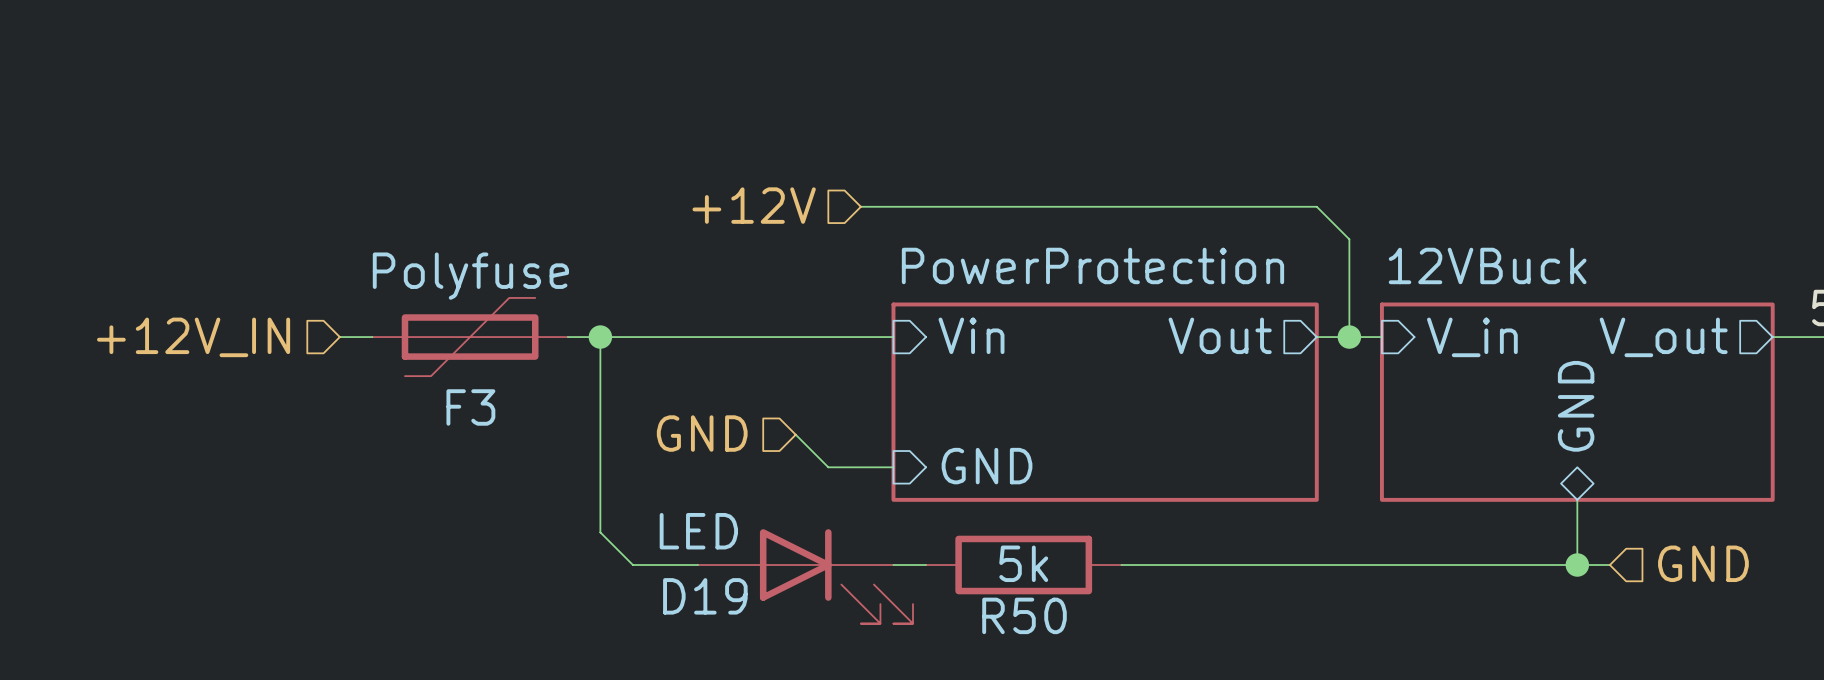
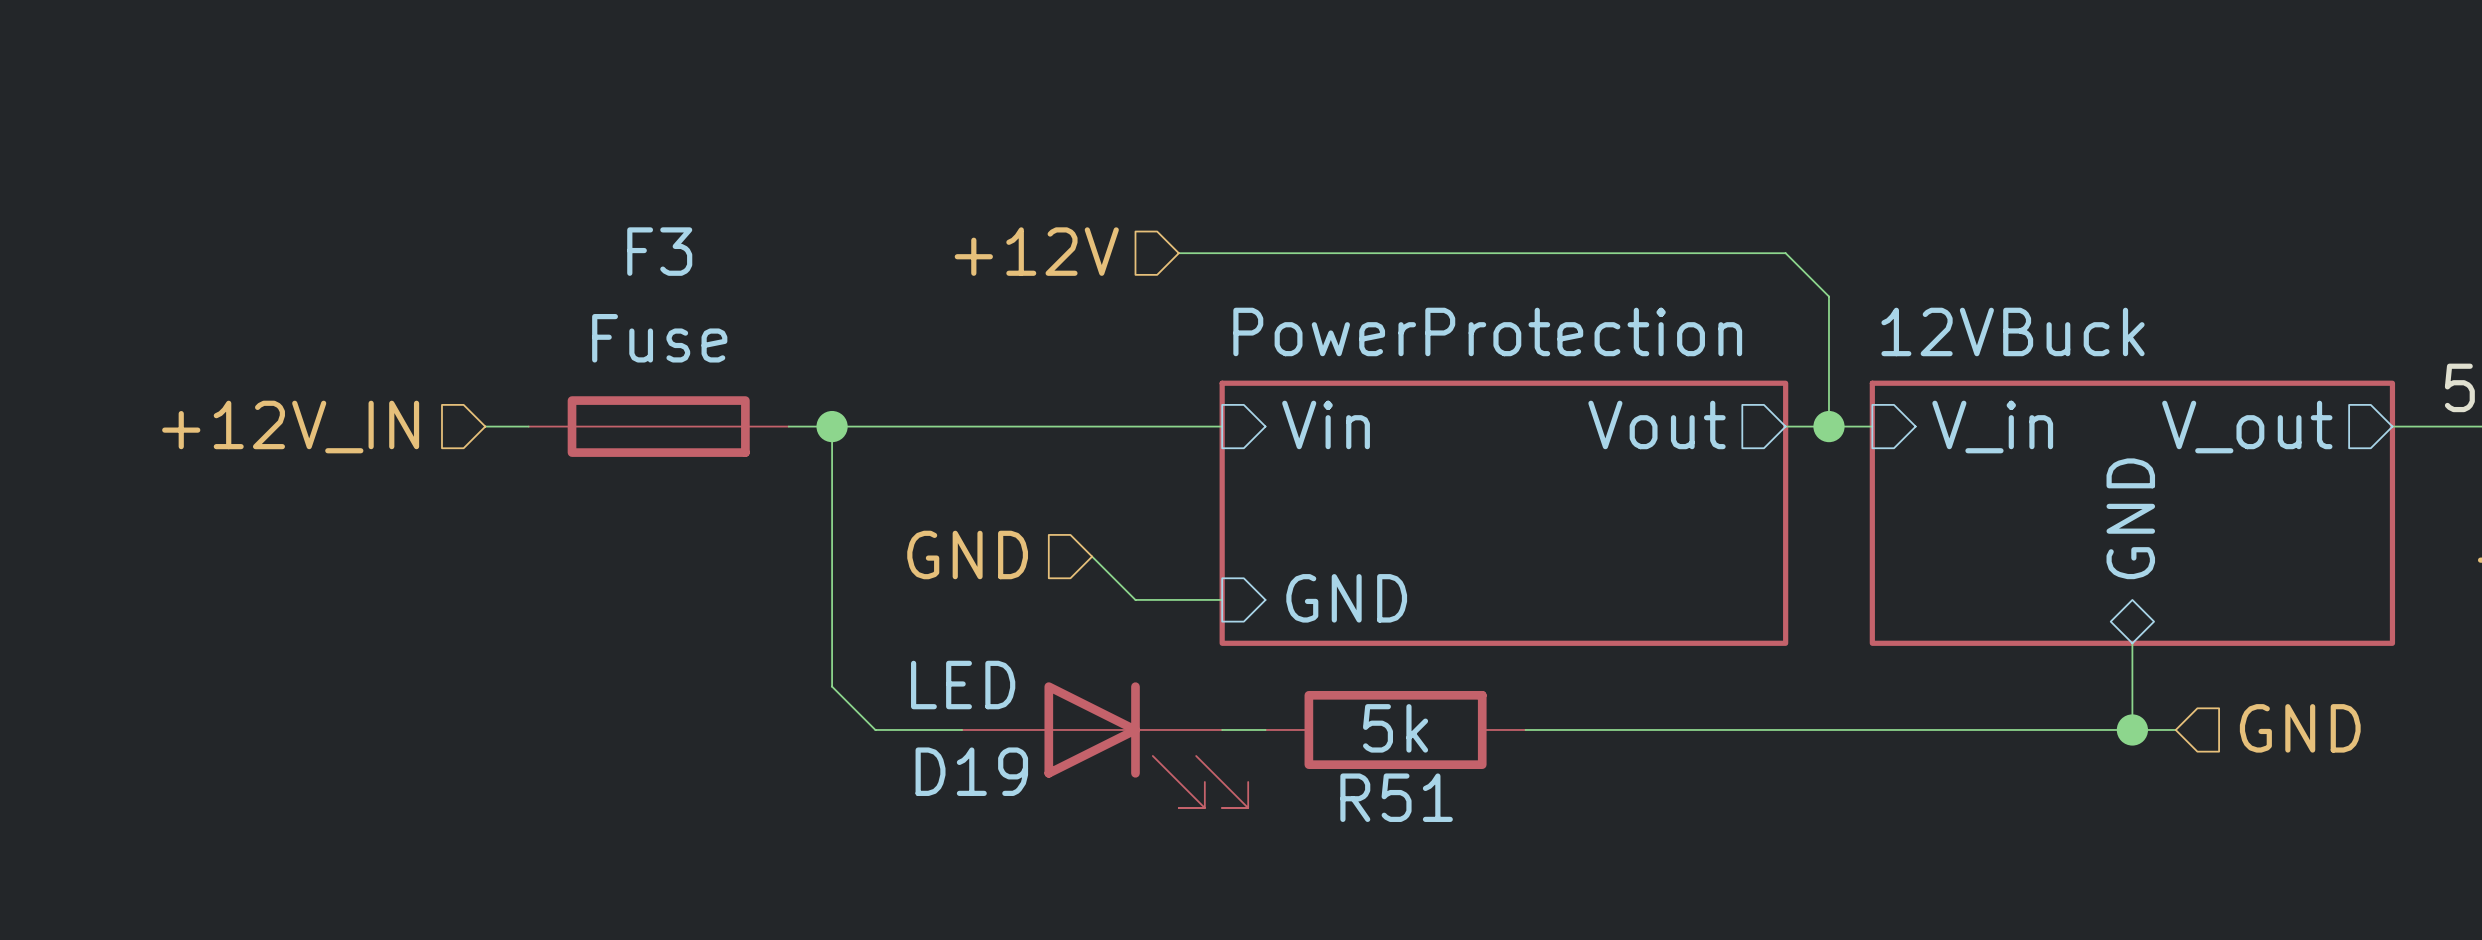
F3 value: Polyfuse (470, 276) -> Fuse (659, 338)
F3 symbol: [372, 297, 568, 377] -> [528, 396, 789, 457]
F3 name position: F3 (470, 407) -> F3 (659, 251)
R50 name: R50 (1024, 615) -> R51 (1396, 797)

